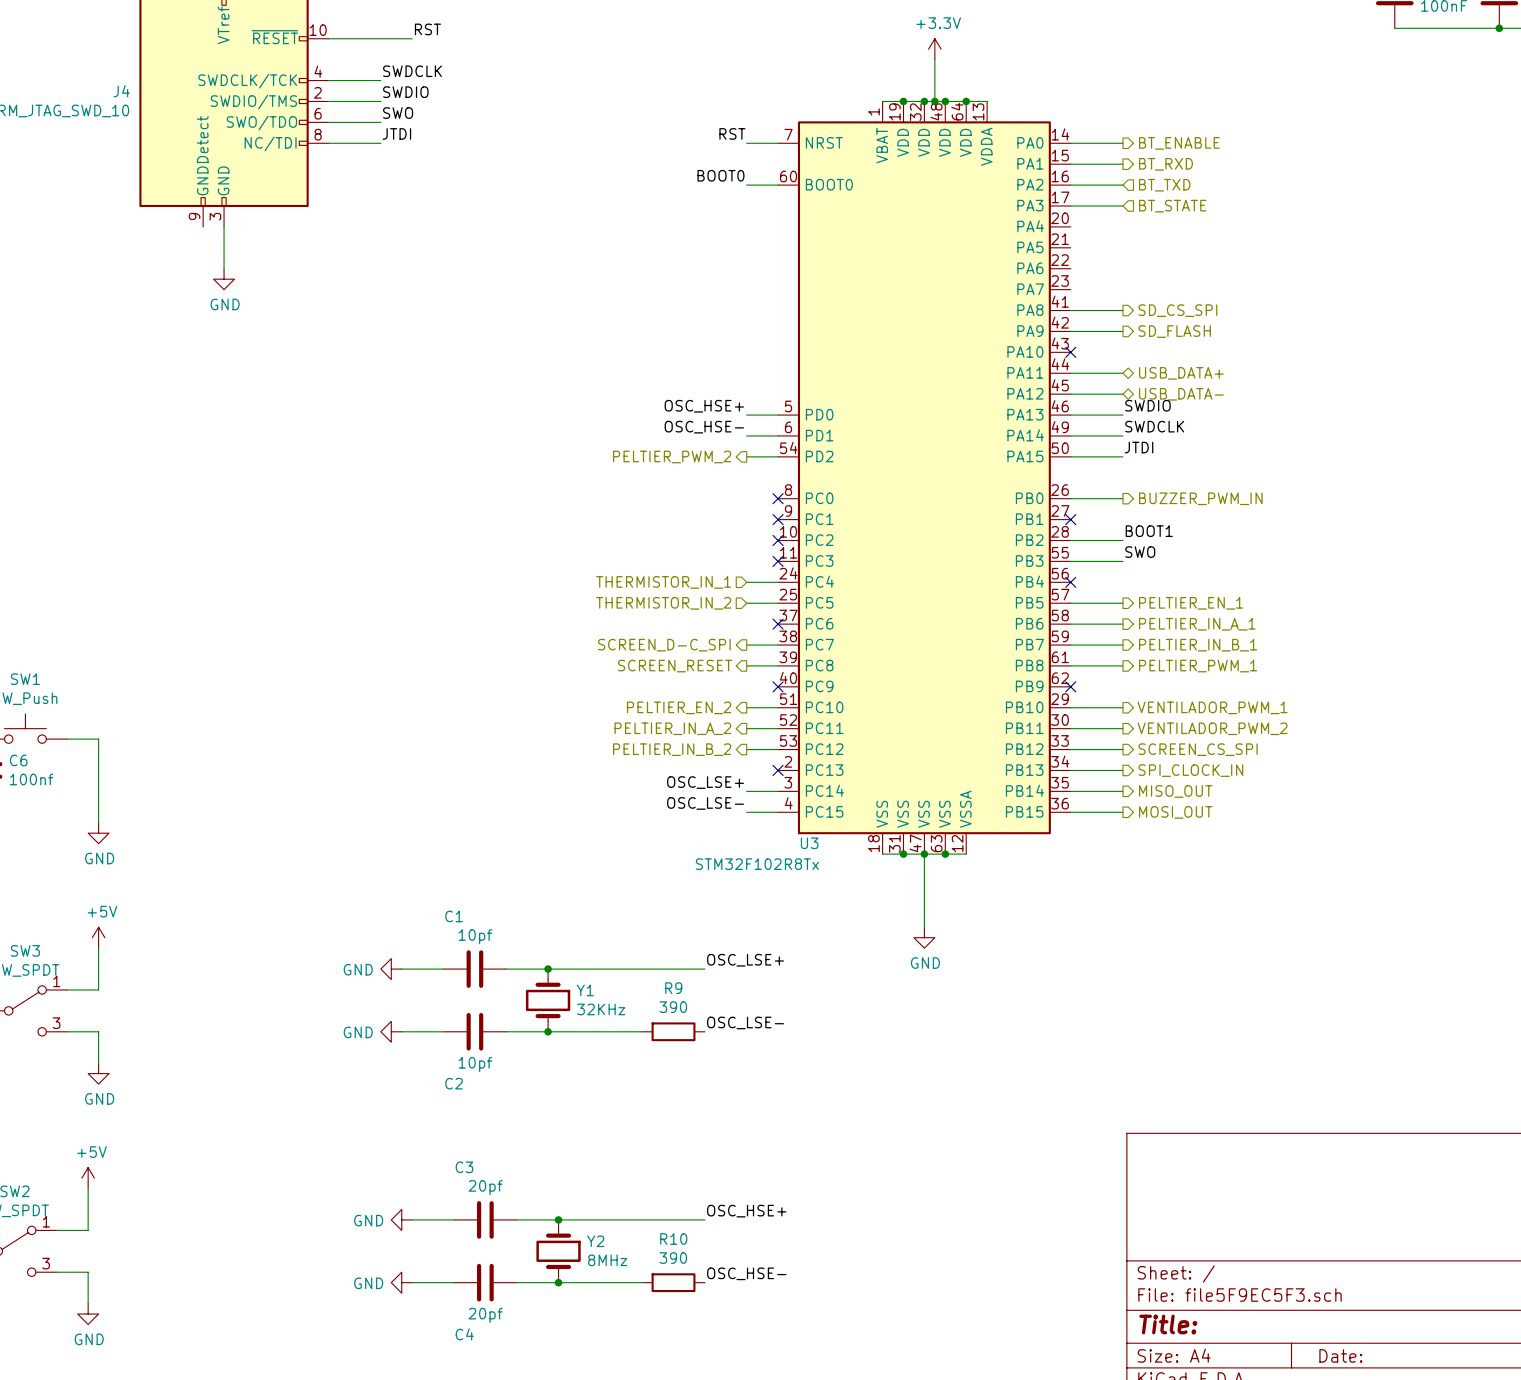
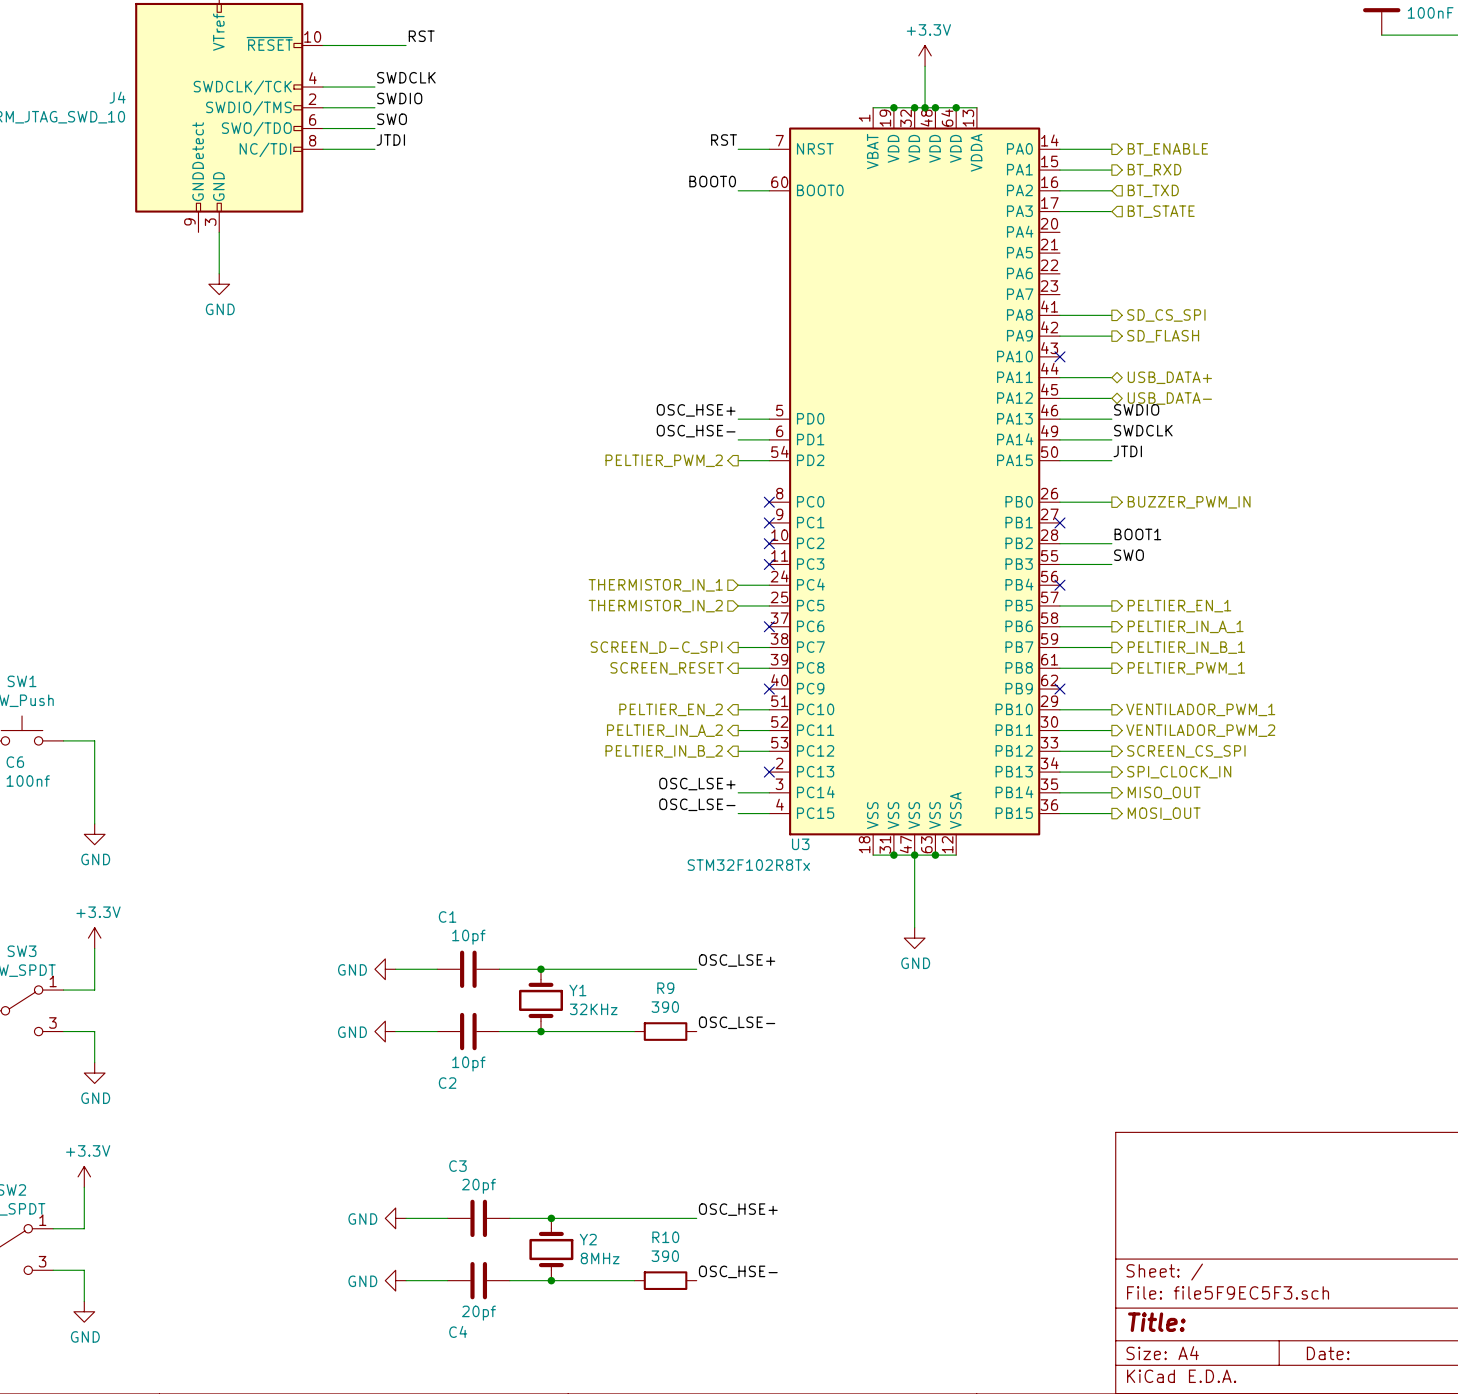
power symbol: +5V (98, 937) -> +3.3V (94, 938)
power symbol: +5V (88, 1178) -> +3.3V (84, 1176)

